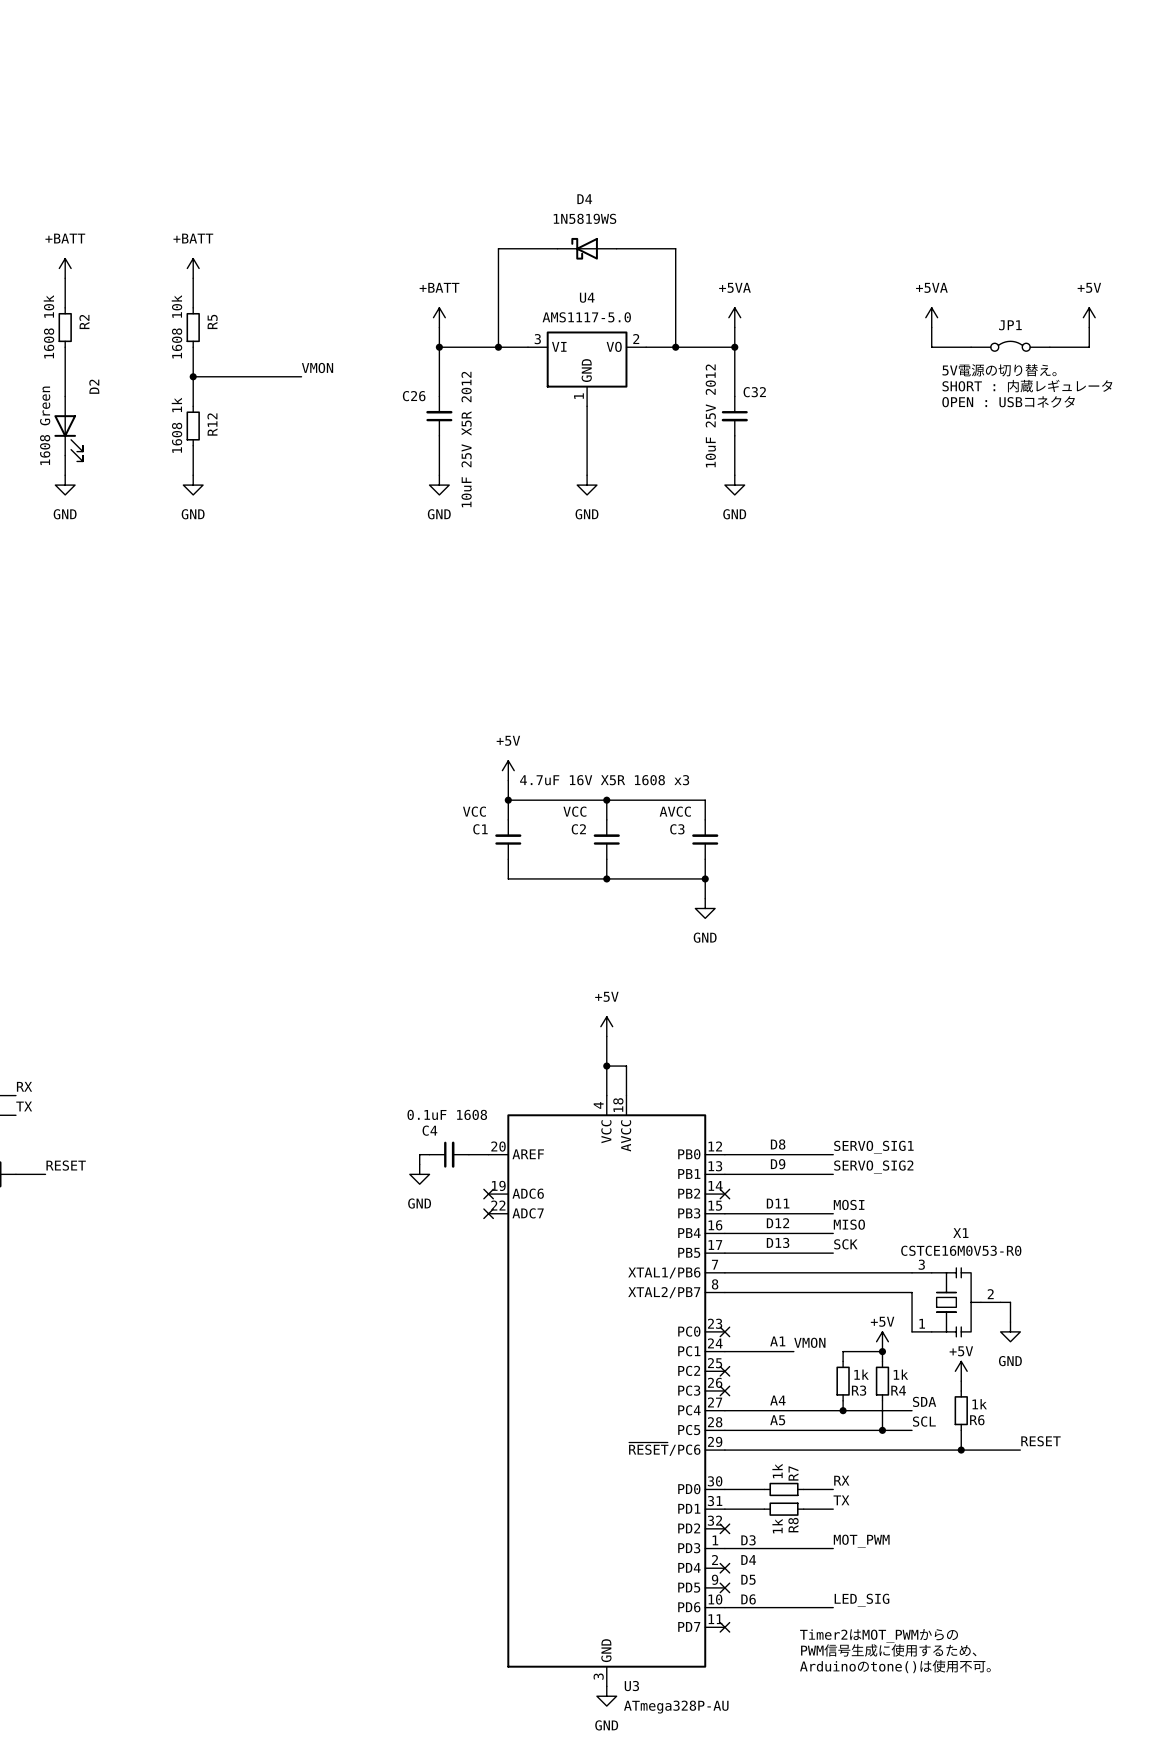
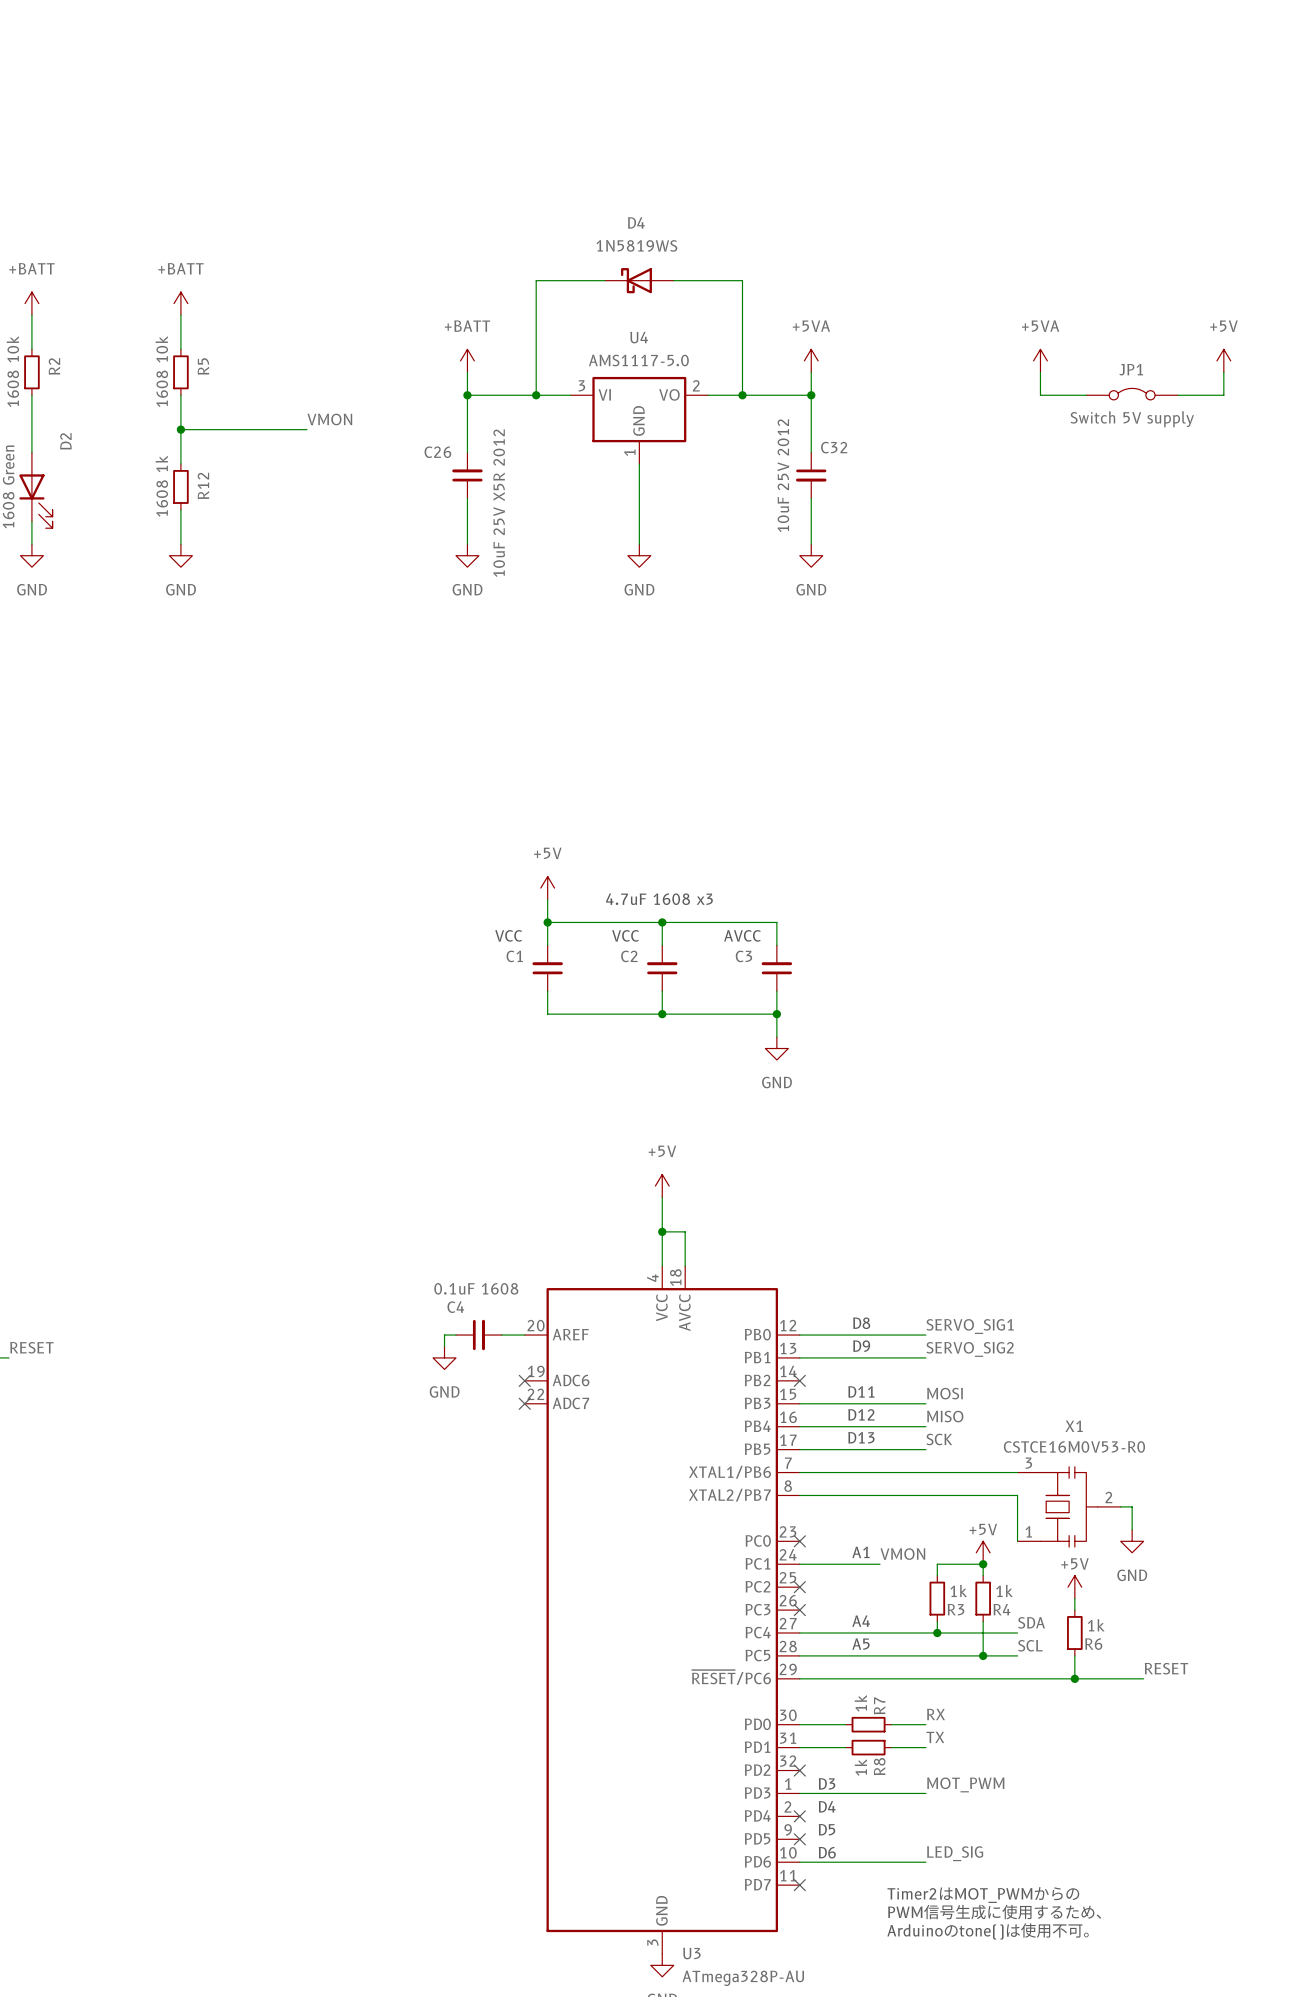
JP1 value: none -> Switch 5V supply (1132, 419)
text: 5V電源の切り替え。 (999, 370) -> none
text: SHORT : 内蔵レギュレータ (1027, 386) -> none
text: OPEN : USBコネクタ (1008, 401) -> none
text: 4.7uF 16V X5R 1608 x3 (604, 780) -> 4.7uF 1608 x3 (659, 899)

